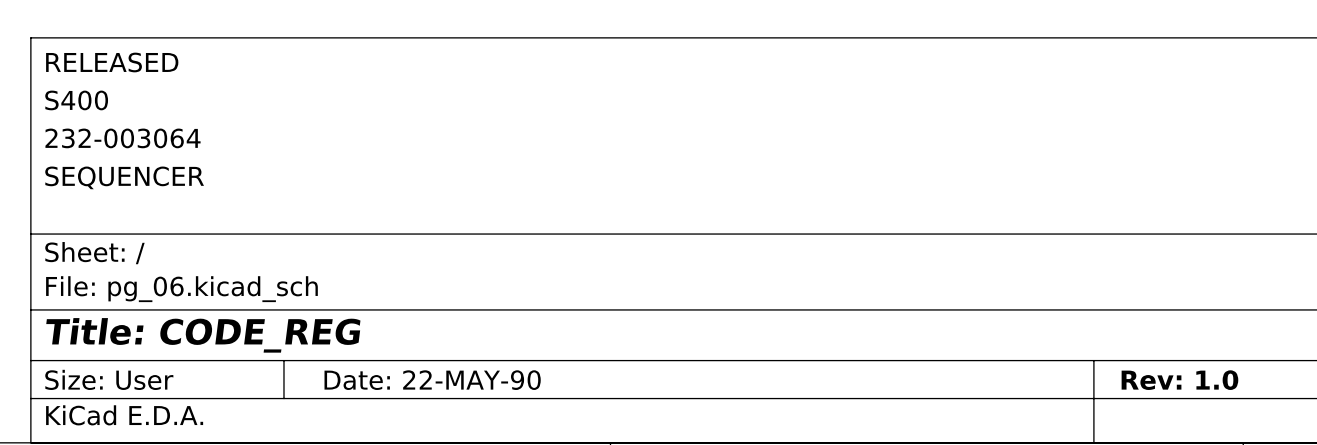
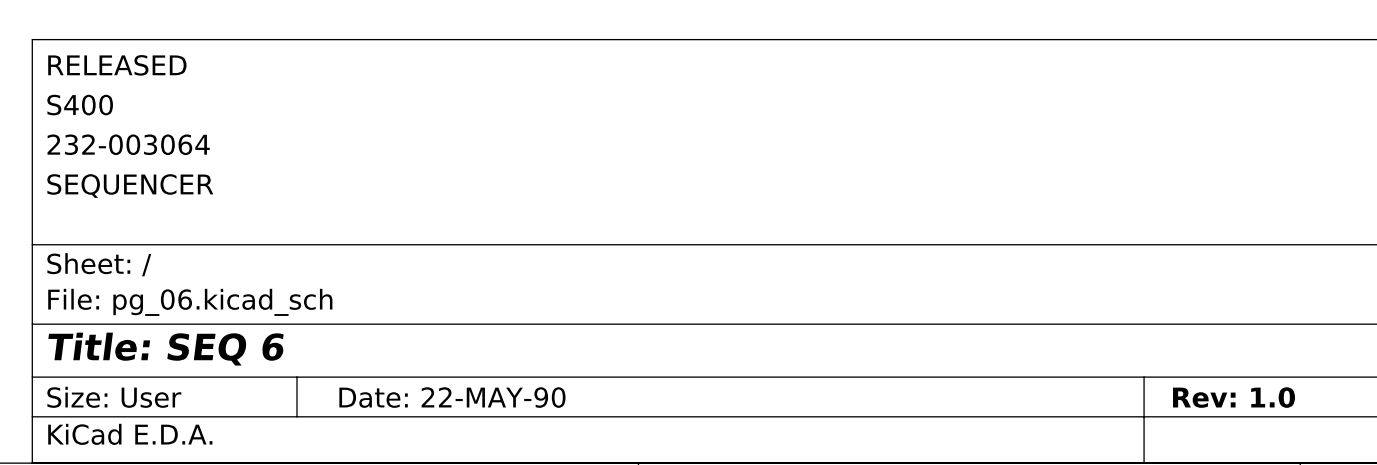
title block: Title: CODE_REG (203, 335) -> Title: SEQ 6 (166, 349)

